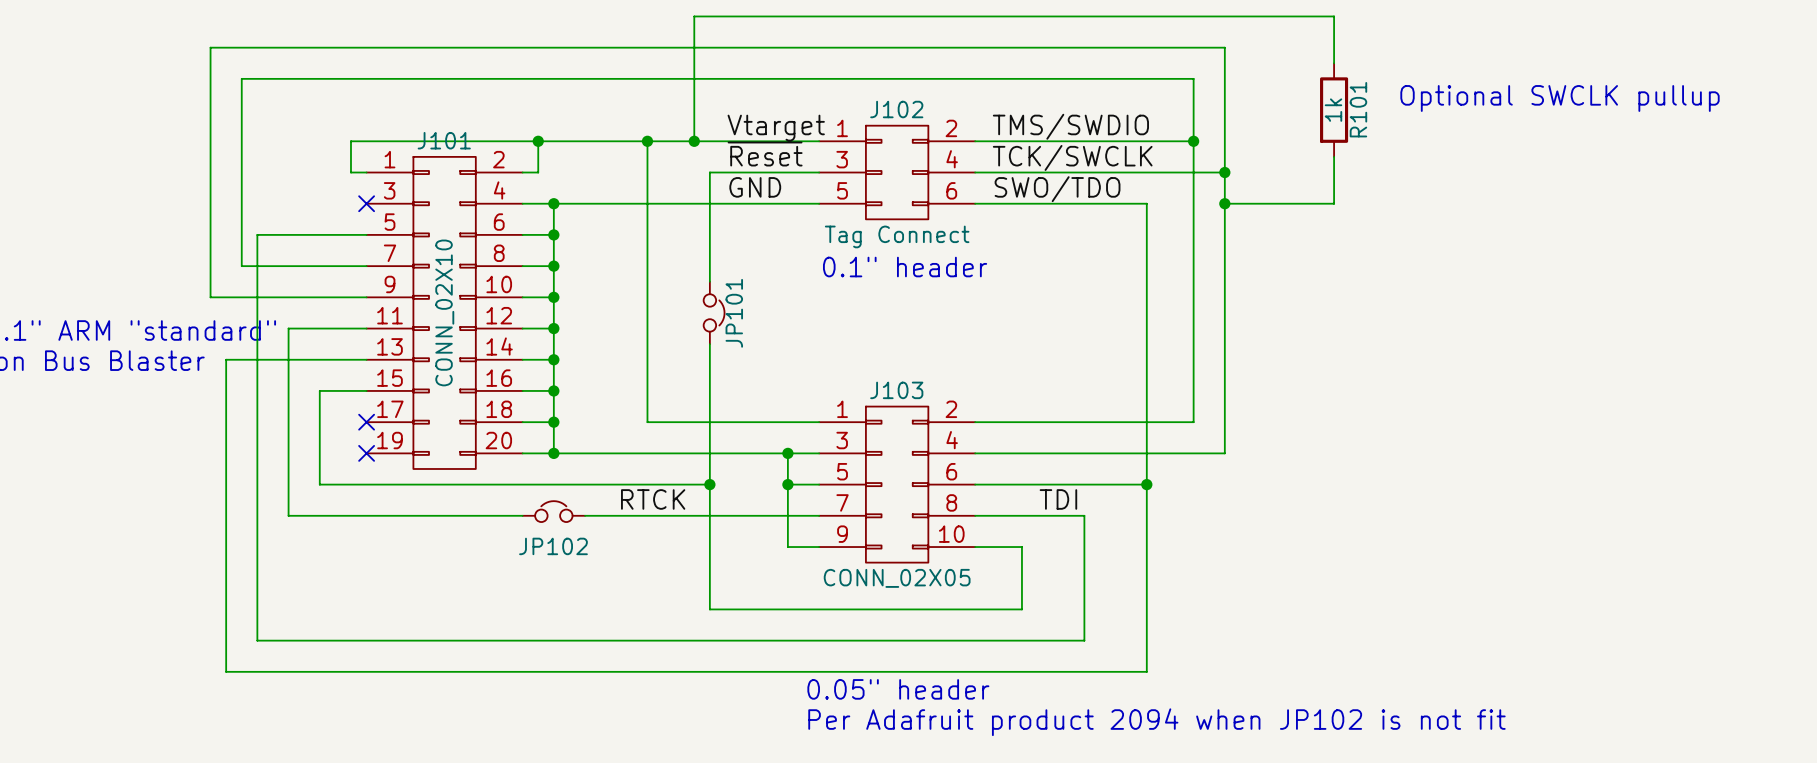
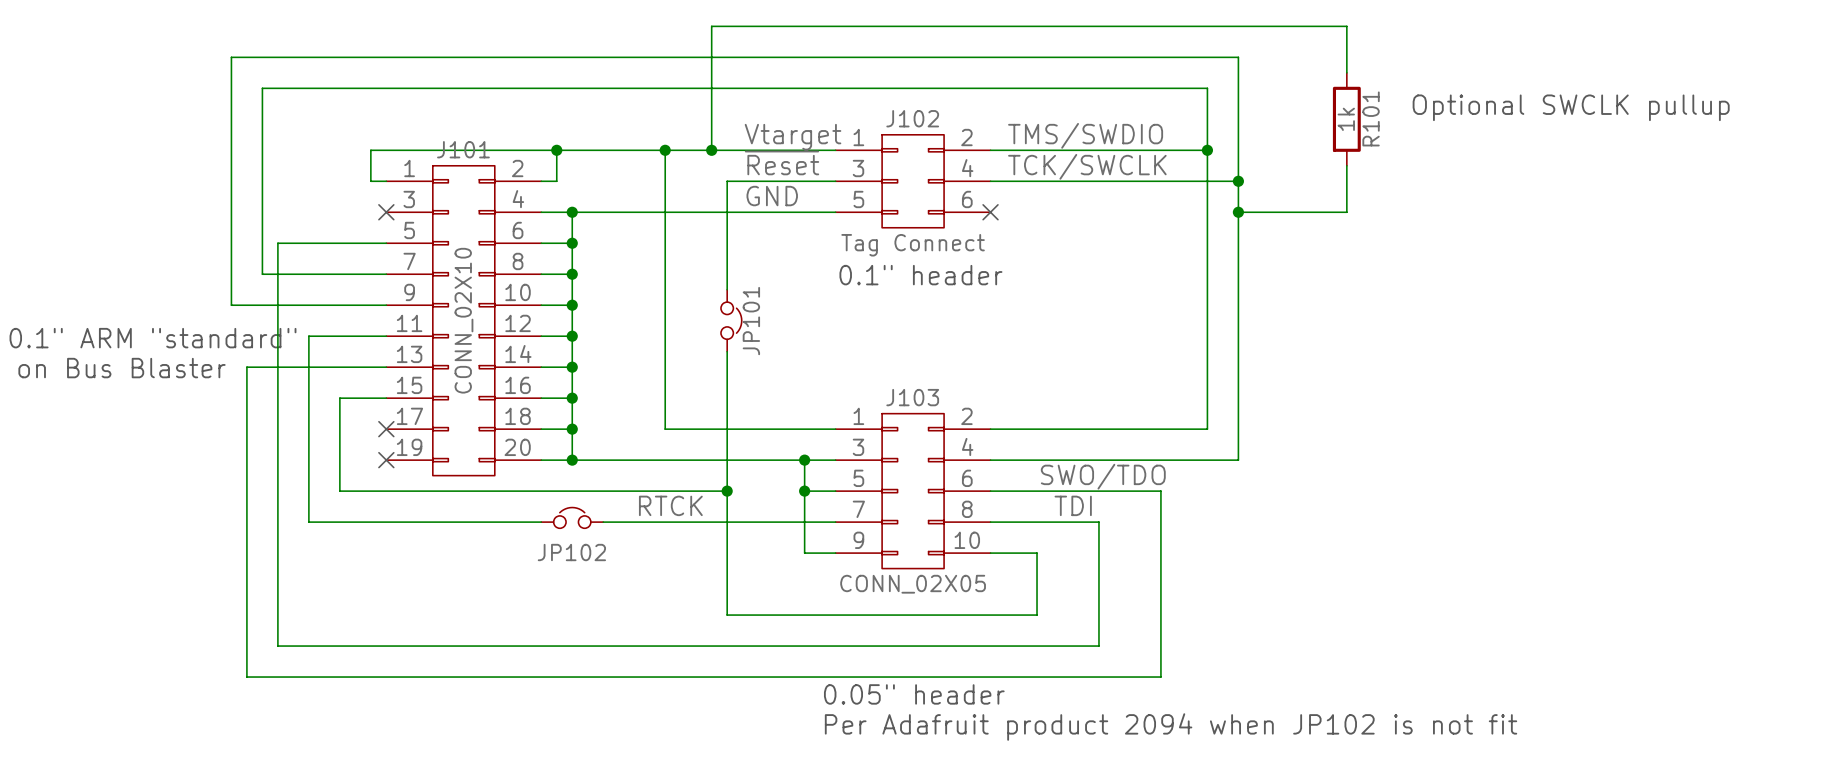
label position: SWO/TDO (1057, 189) -> SWO/TDO (1103, 476)
wire: (975, 203) (1146, 203) (1146, 484) -> none
no-connect mark: none -> (990, 212)
junction: (1146, 484) -> none

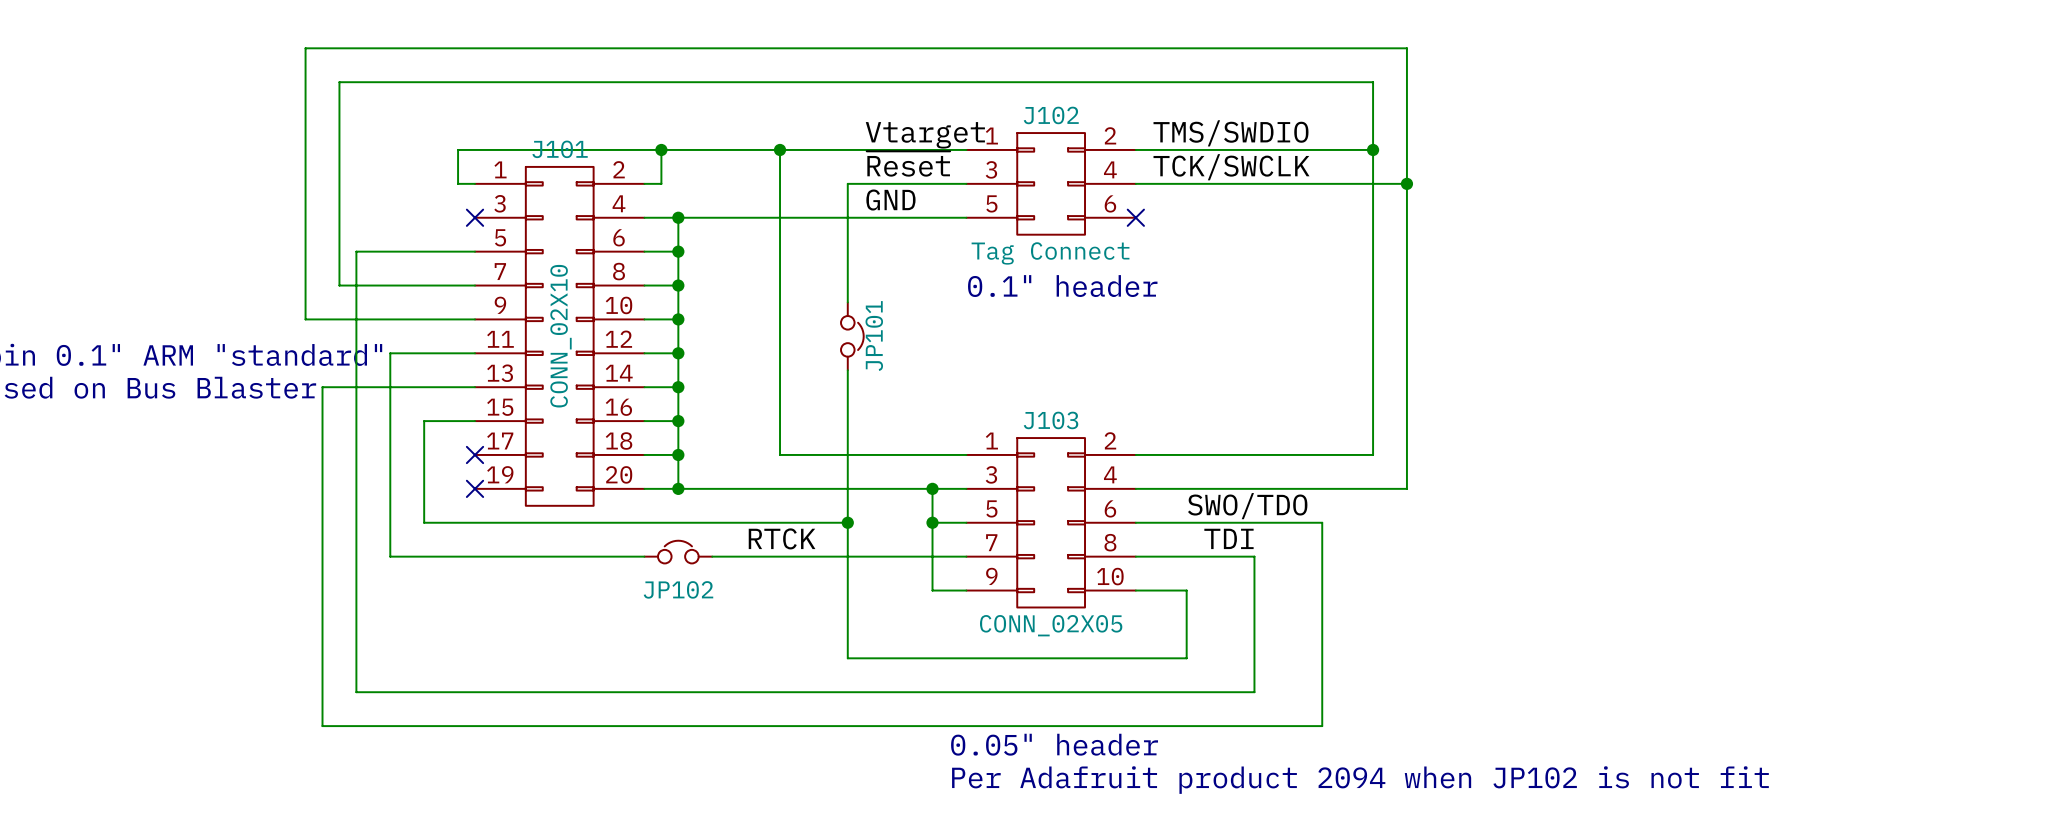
wire: (1346, 72) (1346, 26) (711, 26) (711, 150) -> none
text: Optional SWCLK pullup (1571, 107) -> none
R101: 1k (1346, 119) -> none
junction: (711, 150) -> none
wire: (1346, 165) (1346, 212) (1238, 212) -> none
junction: (1238, 212) -> none

